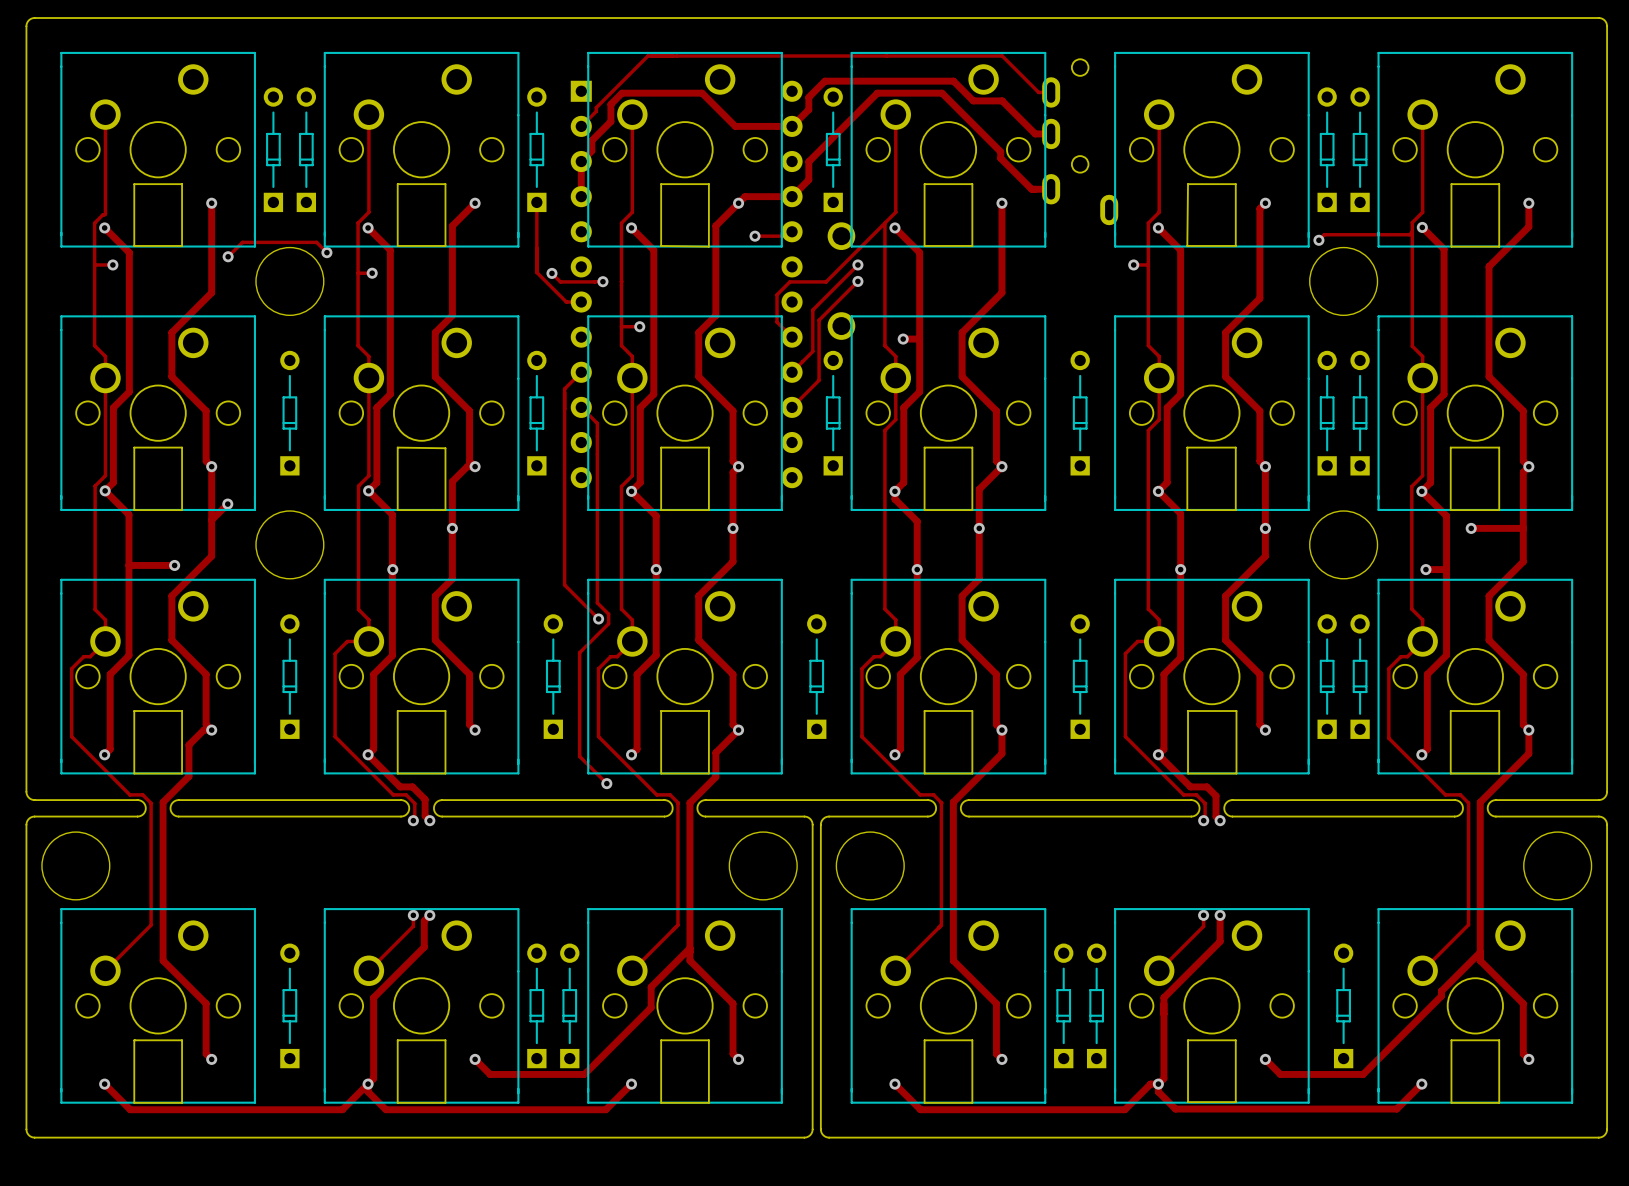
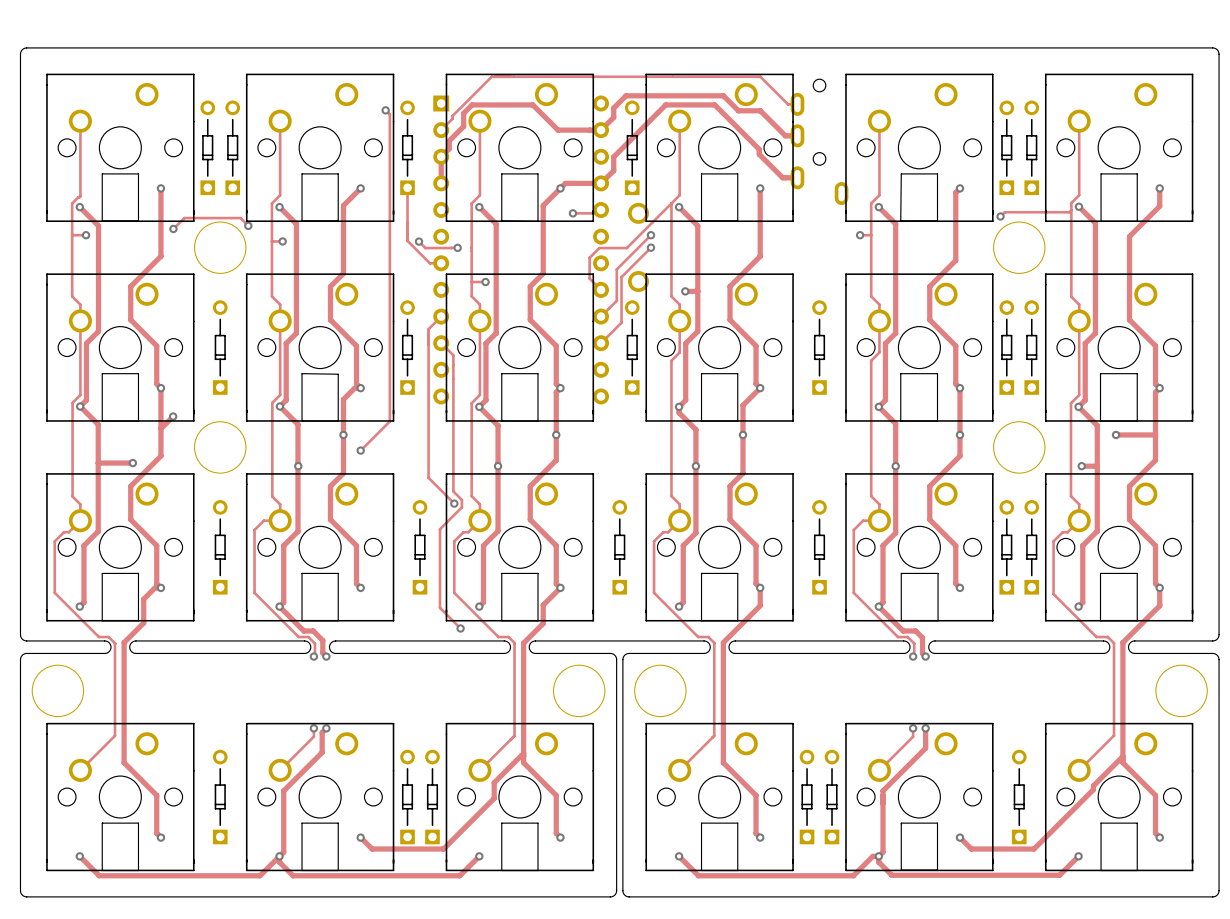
track: none -> (385, 110) (389, 114) (389, 421) (360, 450)
via: none -> (385, 110)
via: none -> (360, 450)

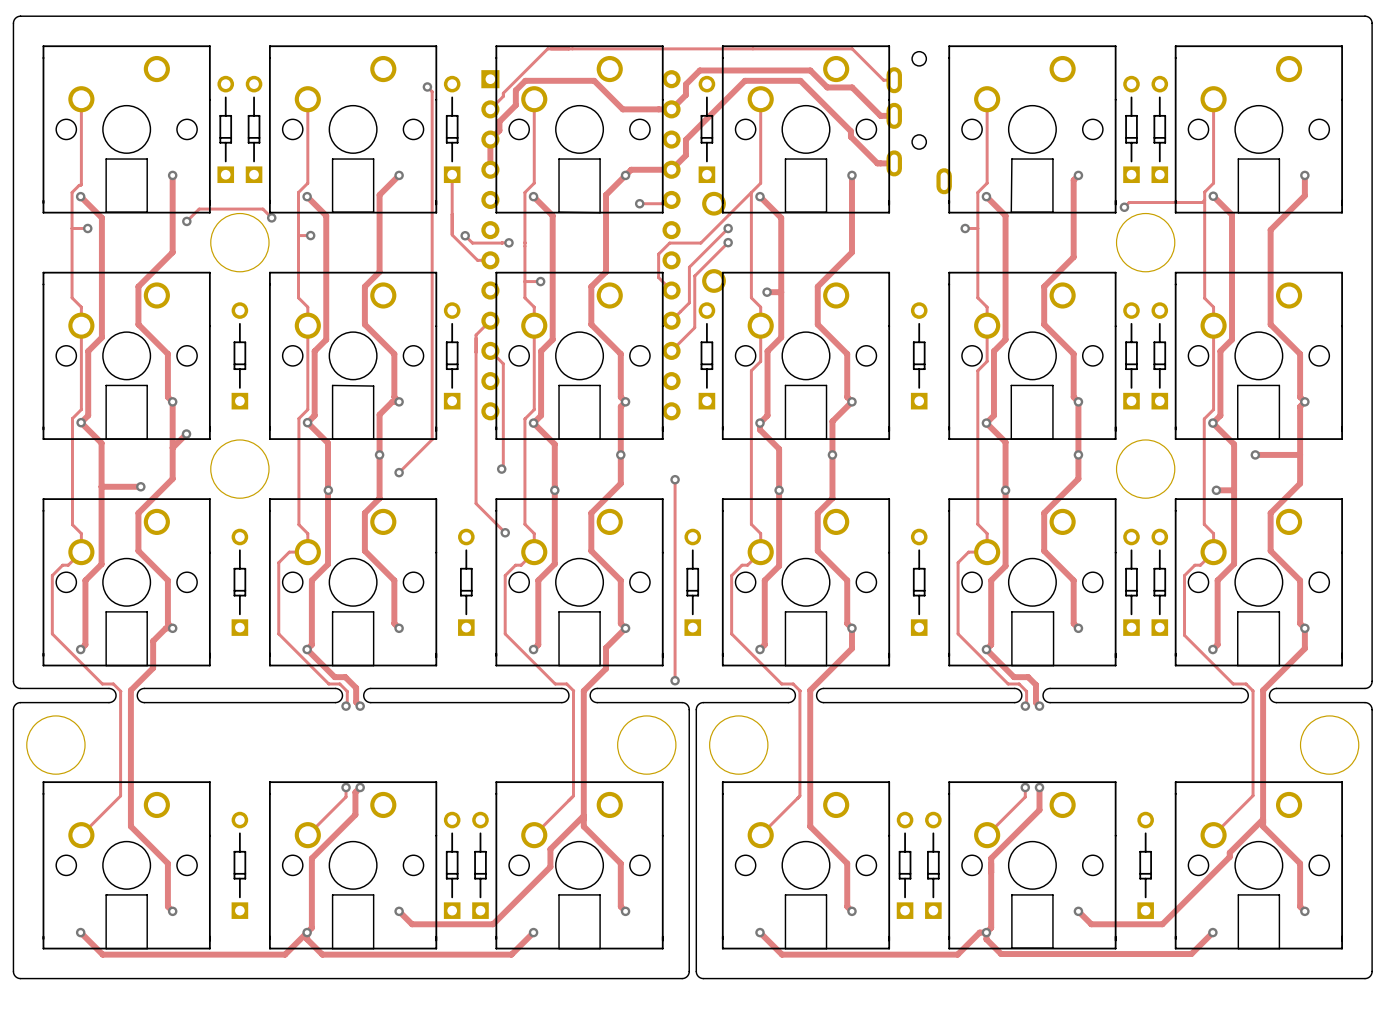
track: (452, 354) (453, 491) (461, 499) (461, 507) (439, 529) (439, 607) (460, 628) -> (503, 363) (503, 467) (501, 469)
via: none -> (501, 469)
track: none -> (675, 479) (675, 680)
via: none -> (675, 479)
via: (460, 628) -> none
via: none -> (675, 680)

